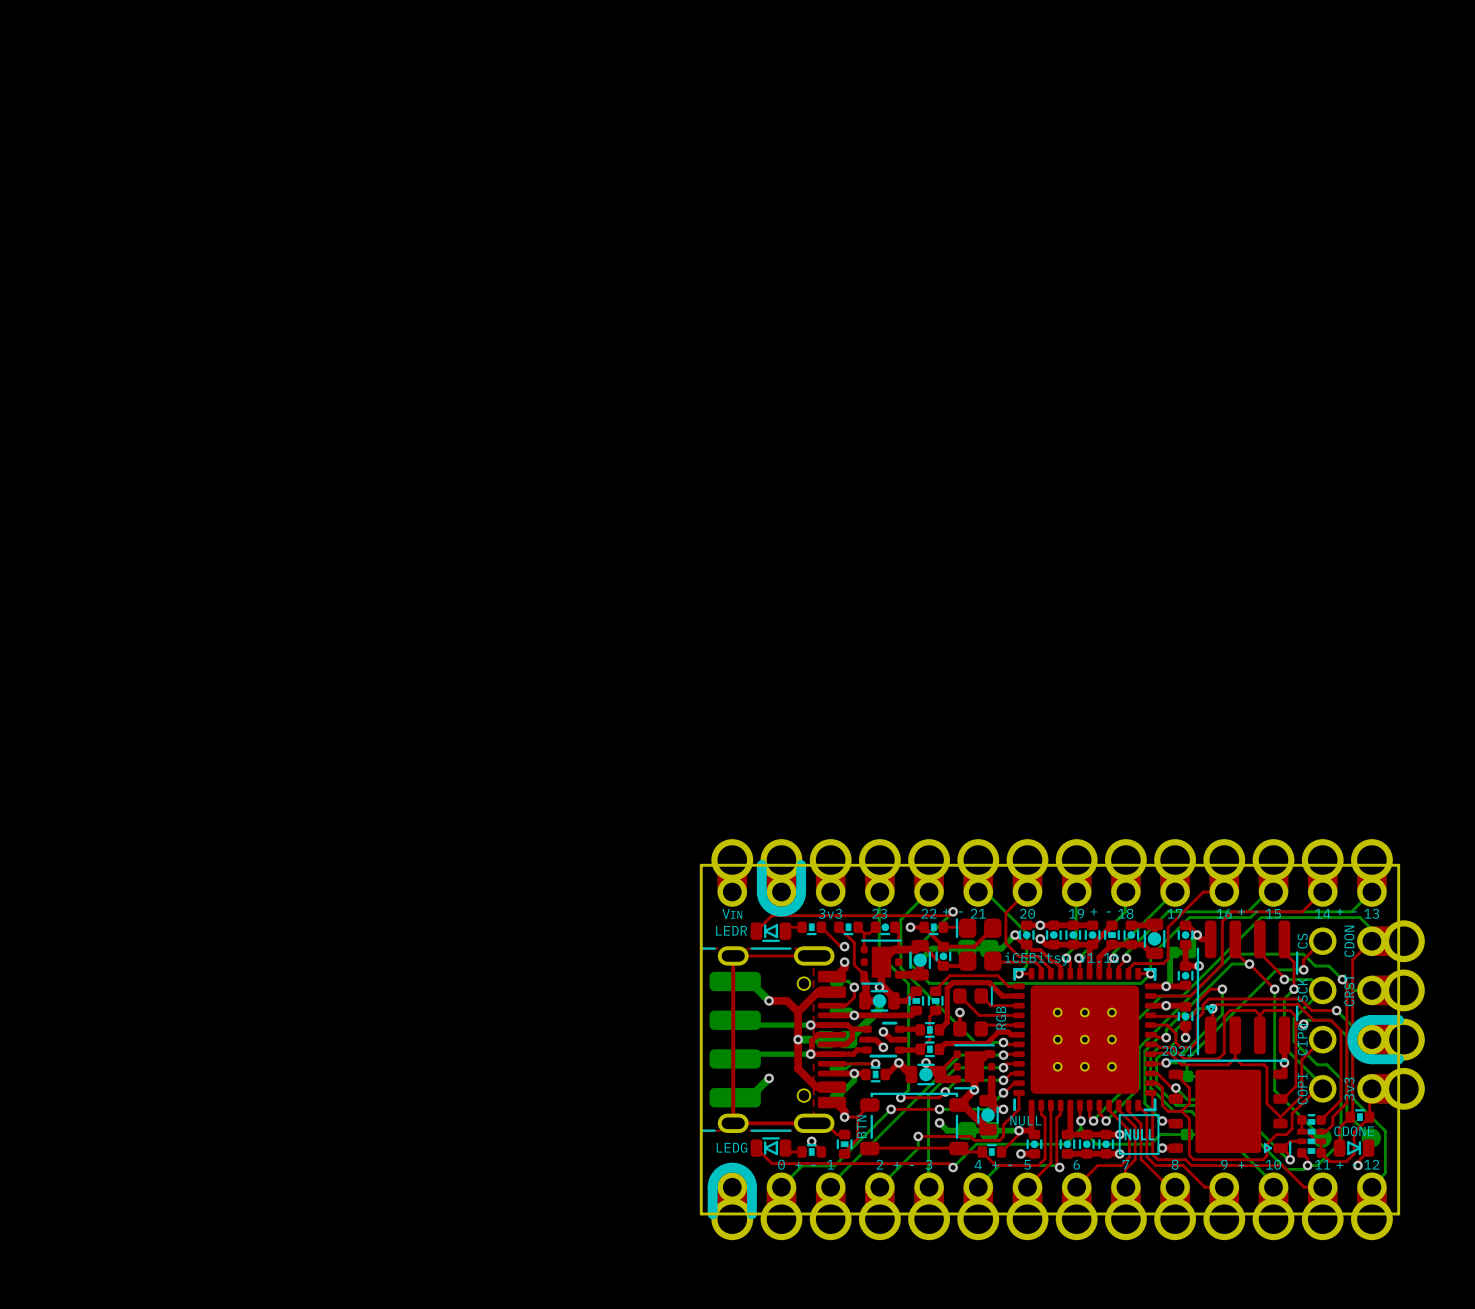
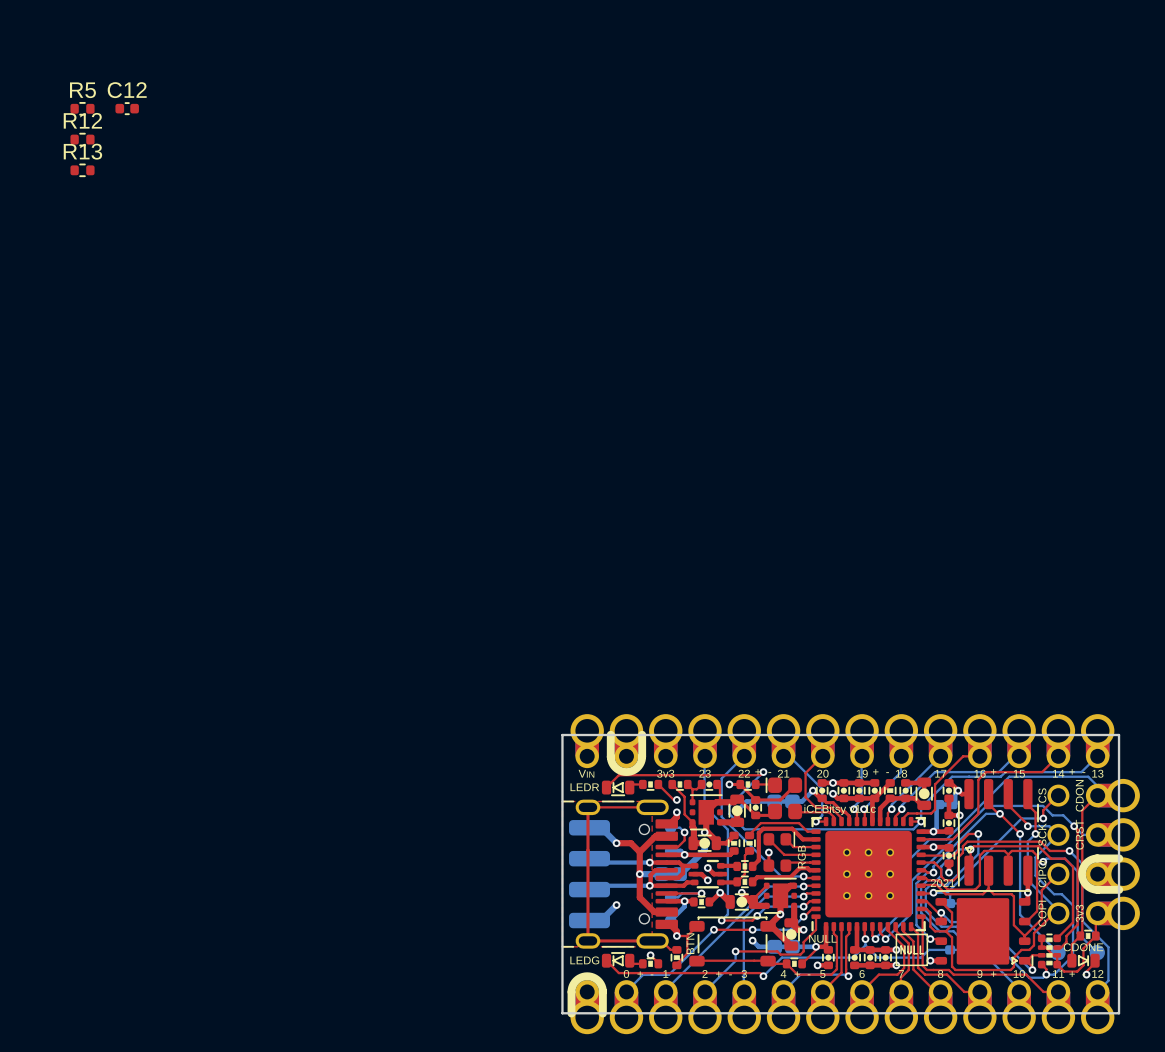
R5: none -> (82, 108)
C12: none -> (127, 108)
R12: none -> (82, 139)
R13: none -> (82, 170)

